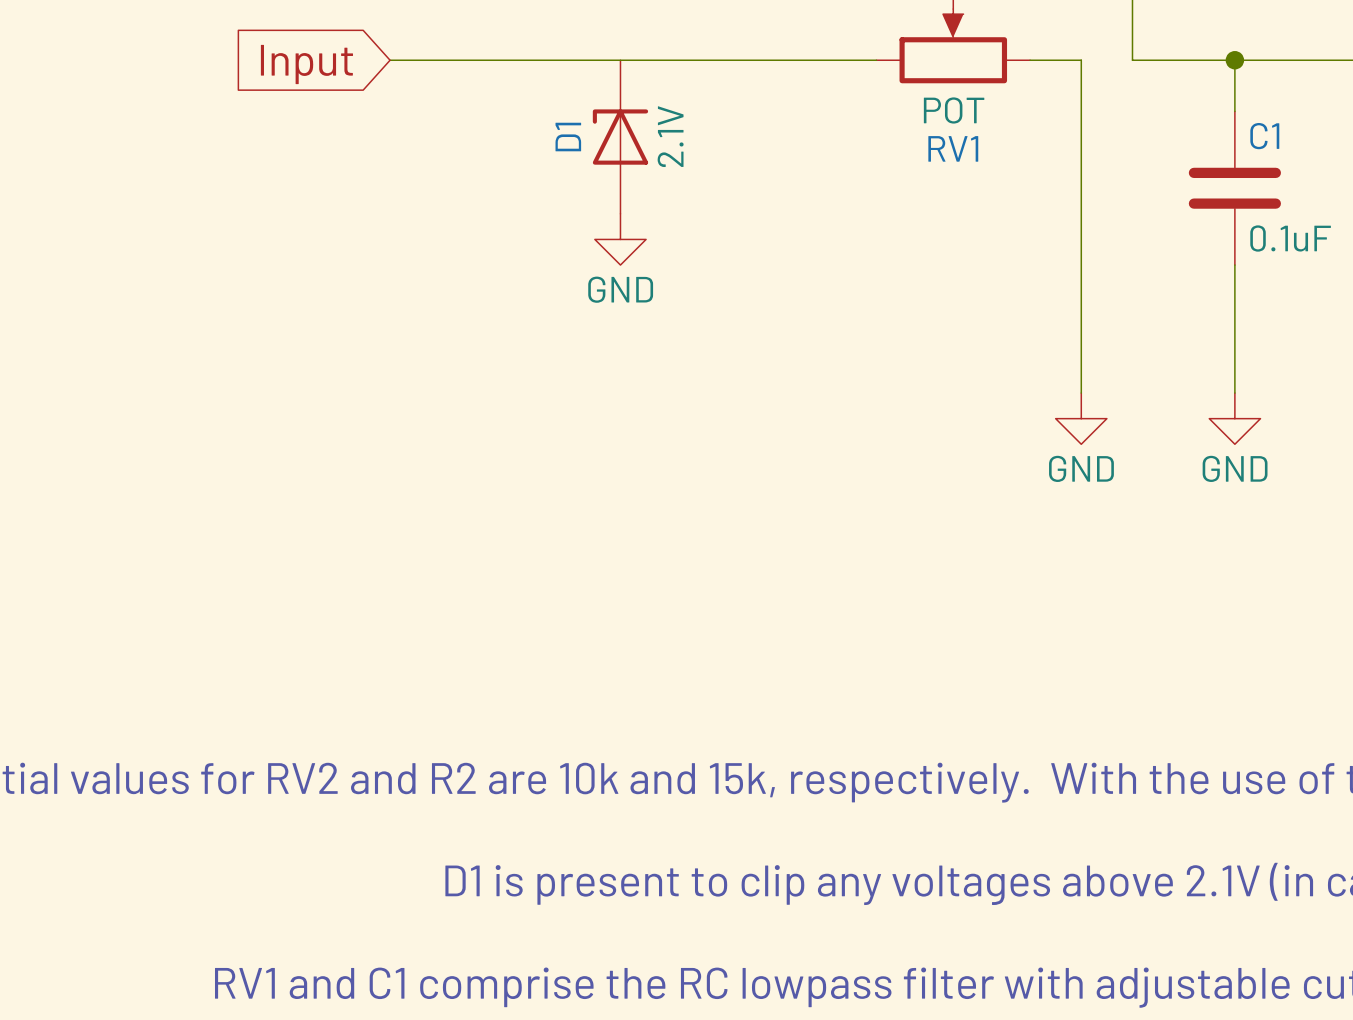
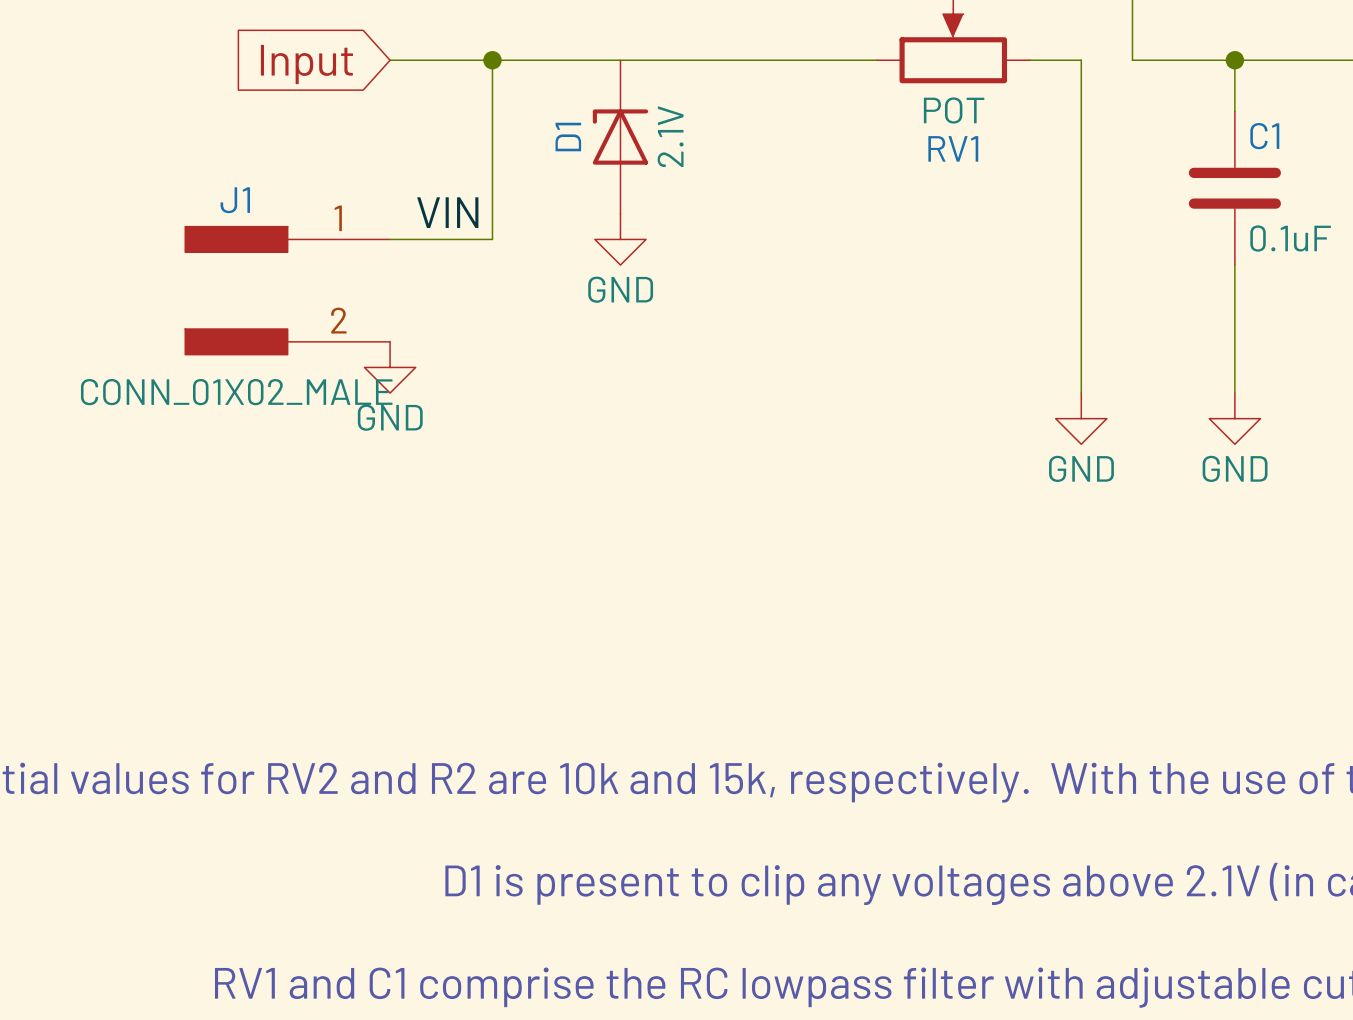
wire: none -> (492, 60) (492, 239) (390, 239)
junction: none -> (492, 60)
label: none -> VIN (447, 212)
J1: none -> CONN_01X02_MALE (287, 290)
power symbol: none -> GND (390, 367)

